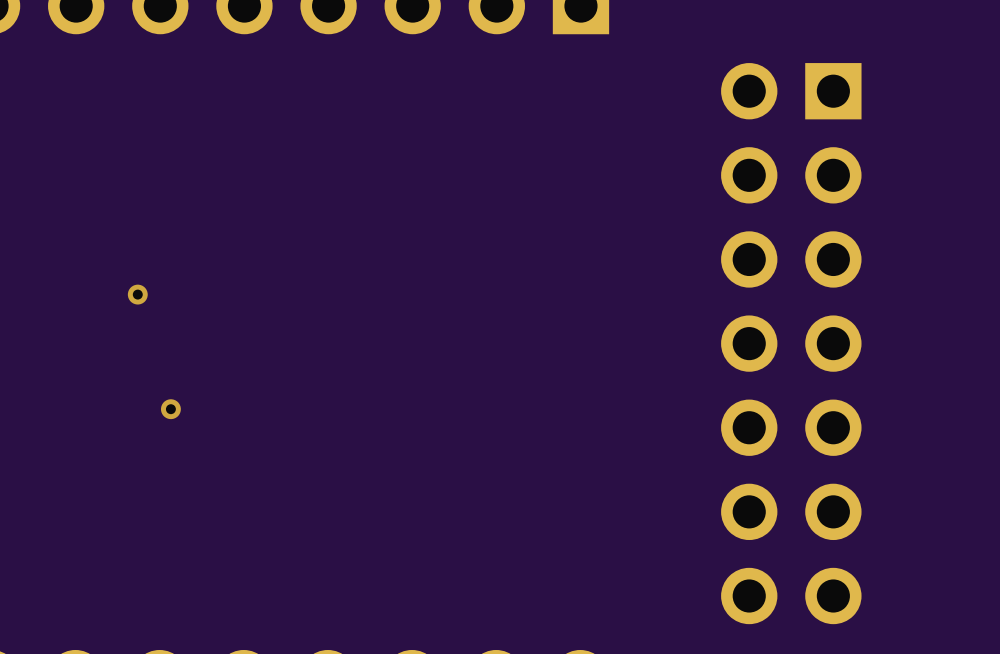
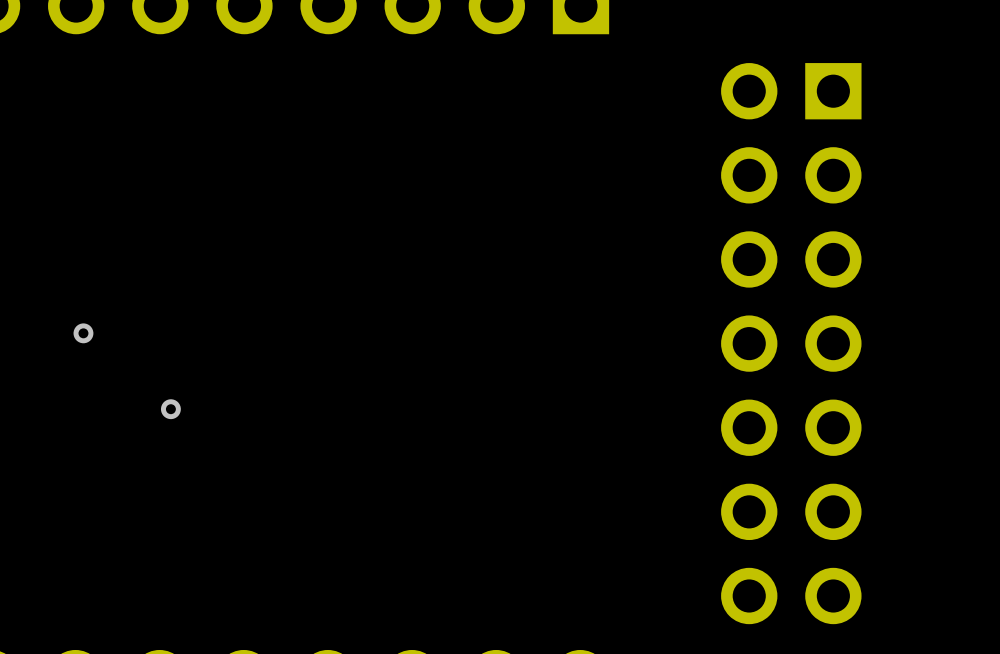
via position: (137, 294) -> (83, 333)

